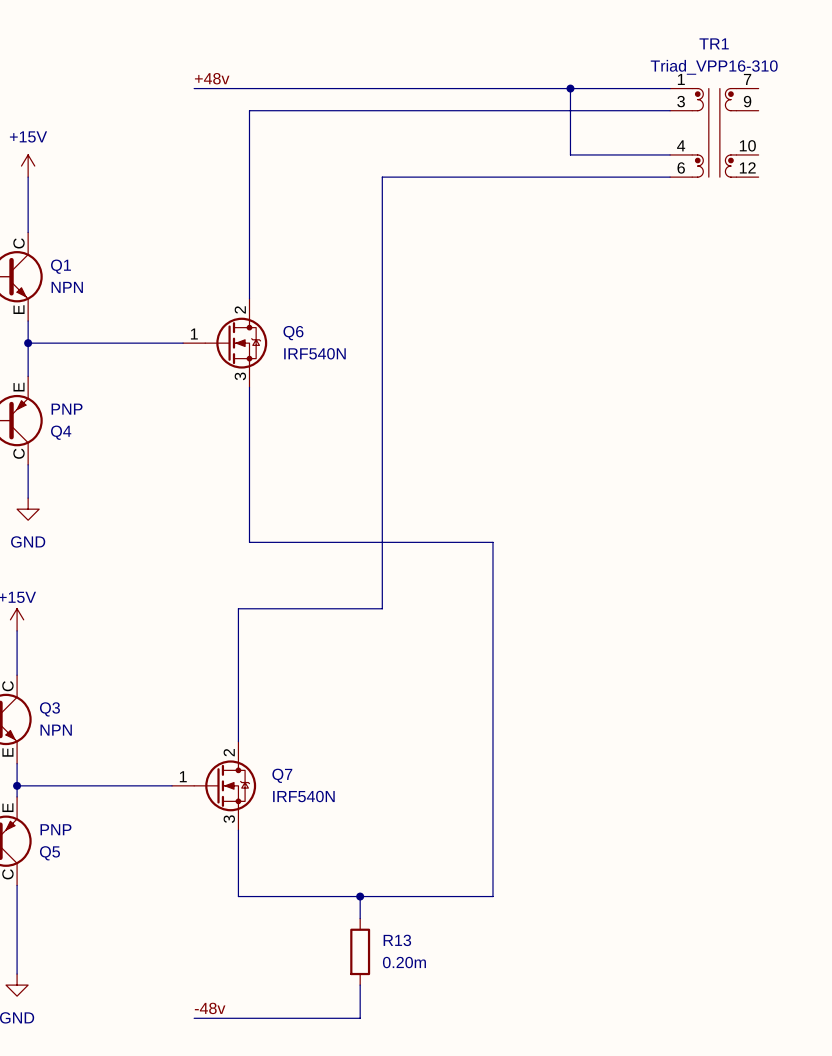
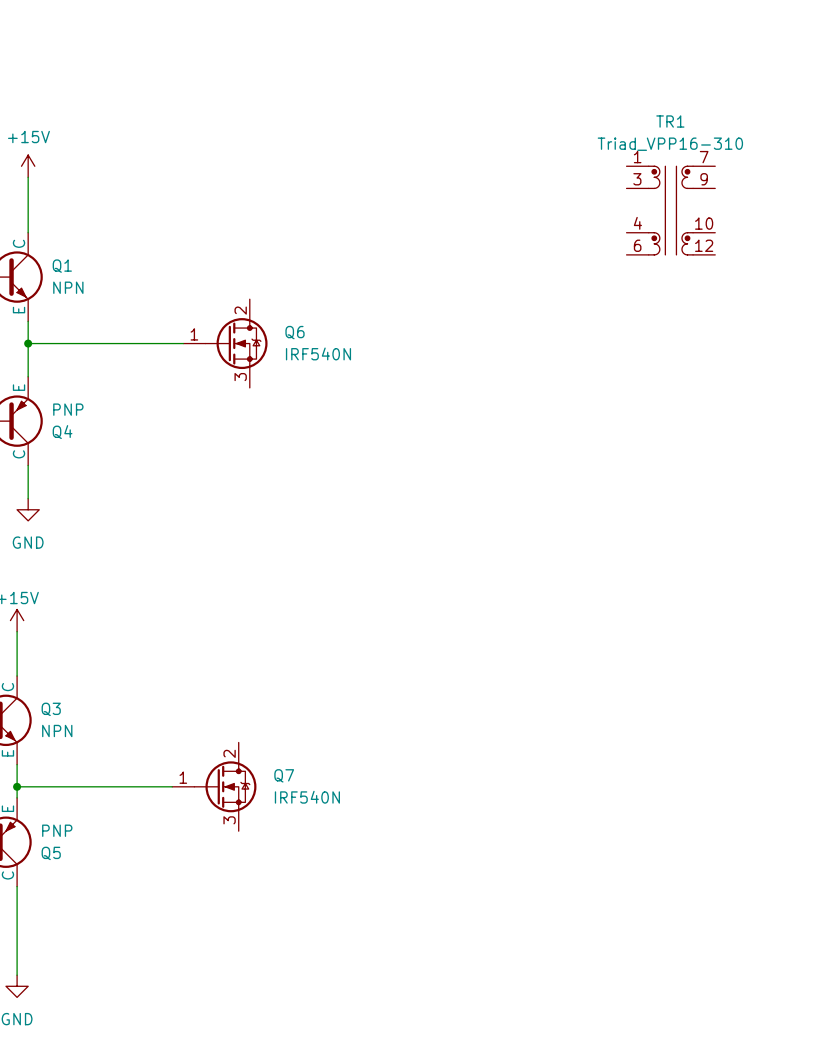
label: +48v (212, 78) -> none
wire: (194, 88) (670, 88) -> none
wire: (570, 88) (570, 154) (670, 154) -> none
junction: (570, 88) -> none
wire: (670, 110) (249, 110) (249, 298) -> none
TR1 position: (714, 132) -> (670, 210)
wire: (670, 177) (382, 177) (382, 608) (238, 608) (238, 741) -> none
wire: (249, 387) (249, 542) (492, 542) (492, 896) (238, 896) (238, 830) -> none
wire: (360, 896) (360, 918) -> none
junction: (360, 896) -> none
R13: 0.20m (360, 951) -> none
wire: (360, 985) (360, 1018) (194, 1018) -> none
label: -48v (210, 1008) -> none

